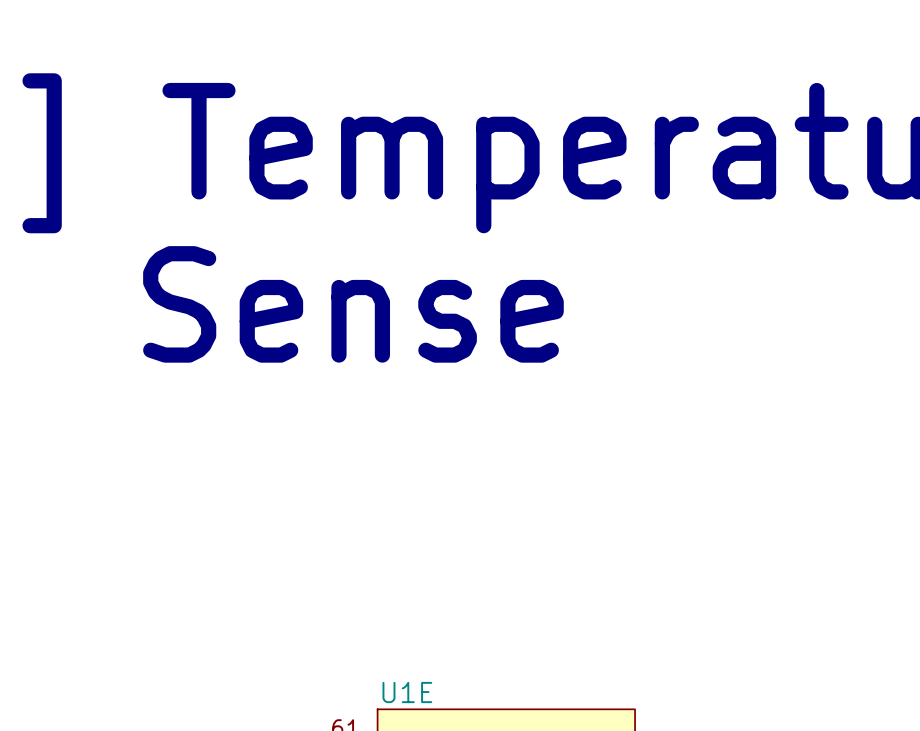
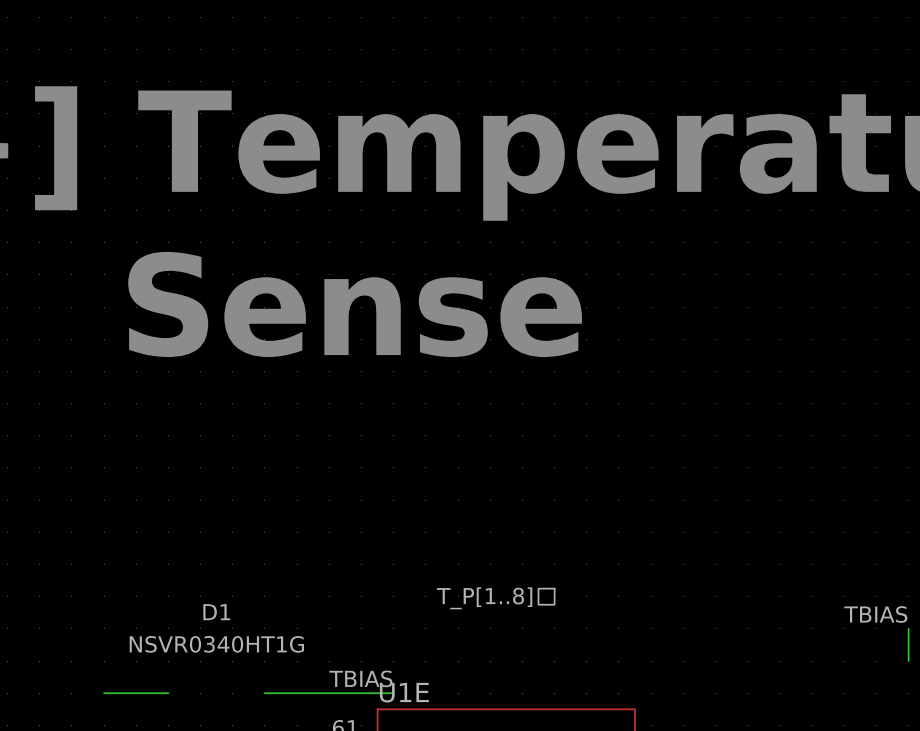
hierarchical label: none -> T_P[1..8] (484, 598)
label: none -> TBIAS (875, 614)
D1: none -> NSVR0340HT1G (216, 628)
wire: none -> (908, 628) (908, 661)
label: none -> TBIAS (360, 678)
wire: none -> (104, 693) (168, 693)
wire: none -> (264, 693) (393, 693)

